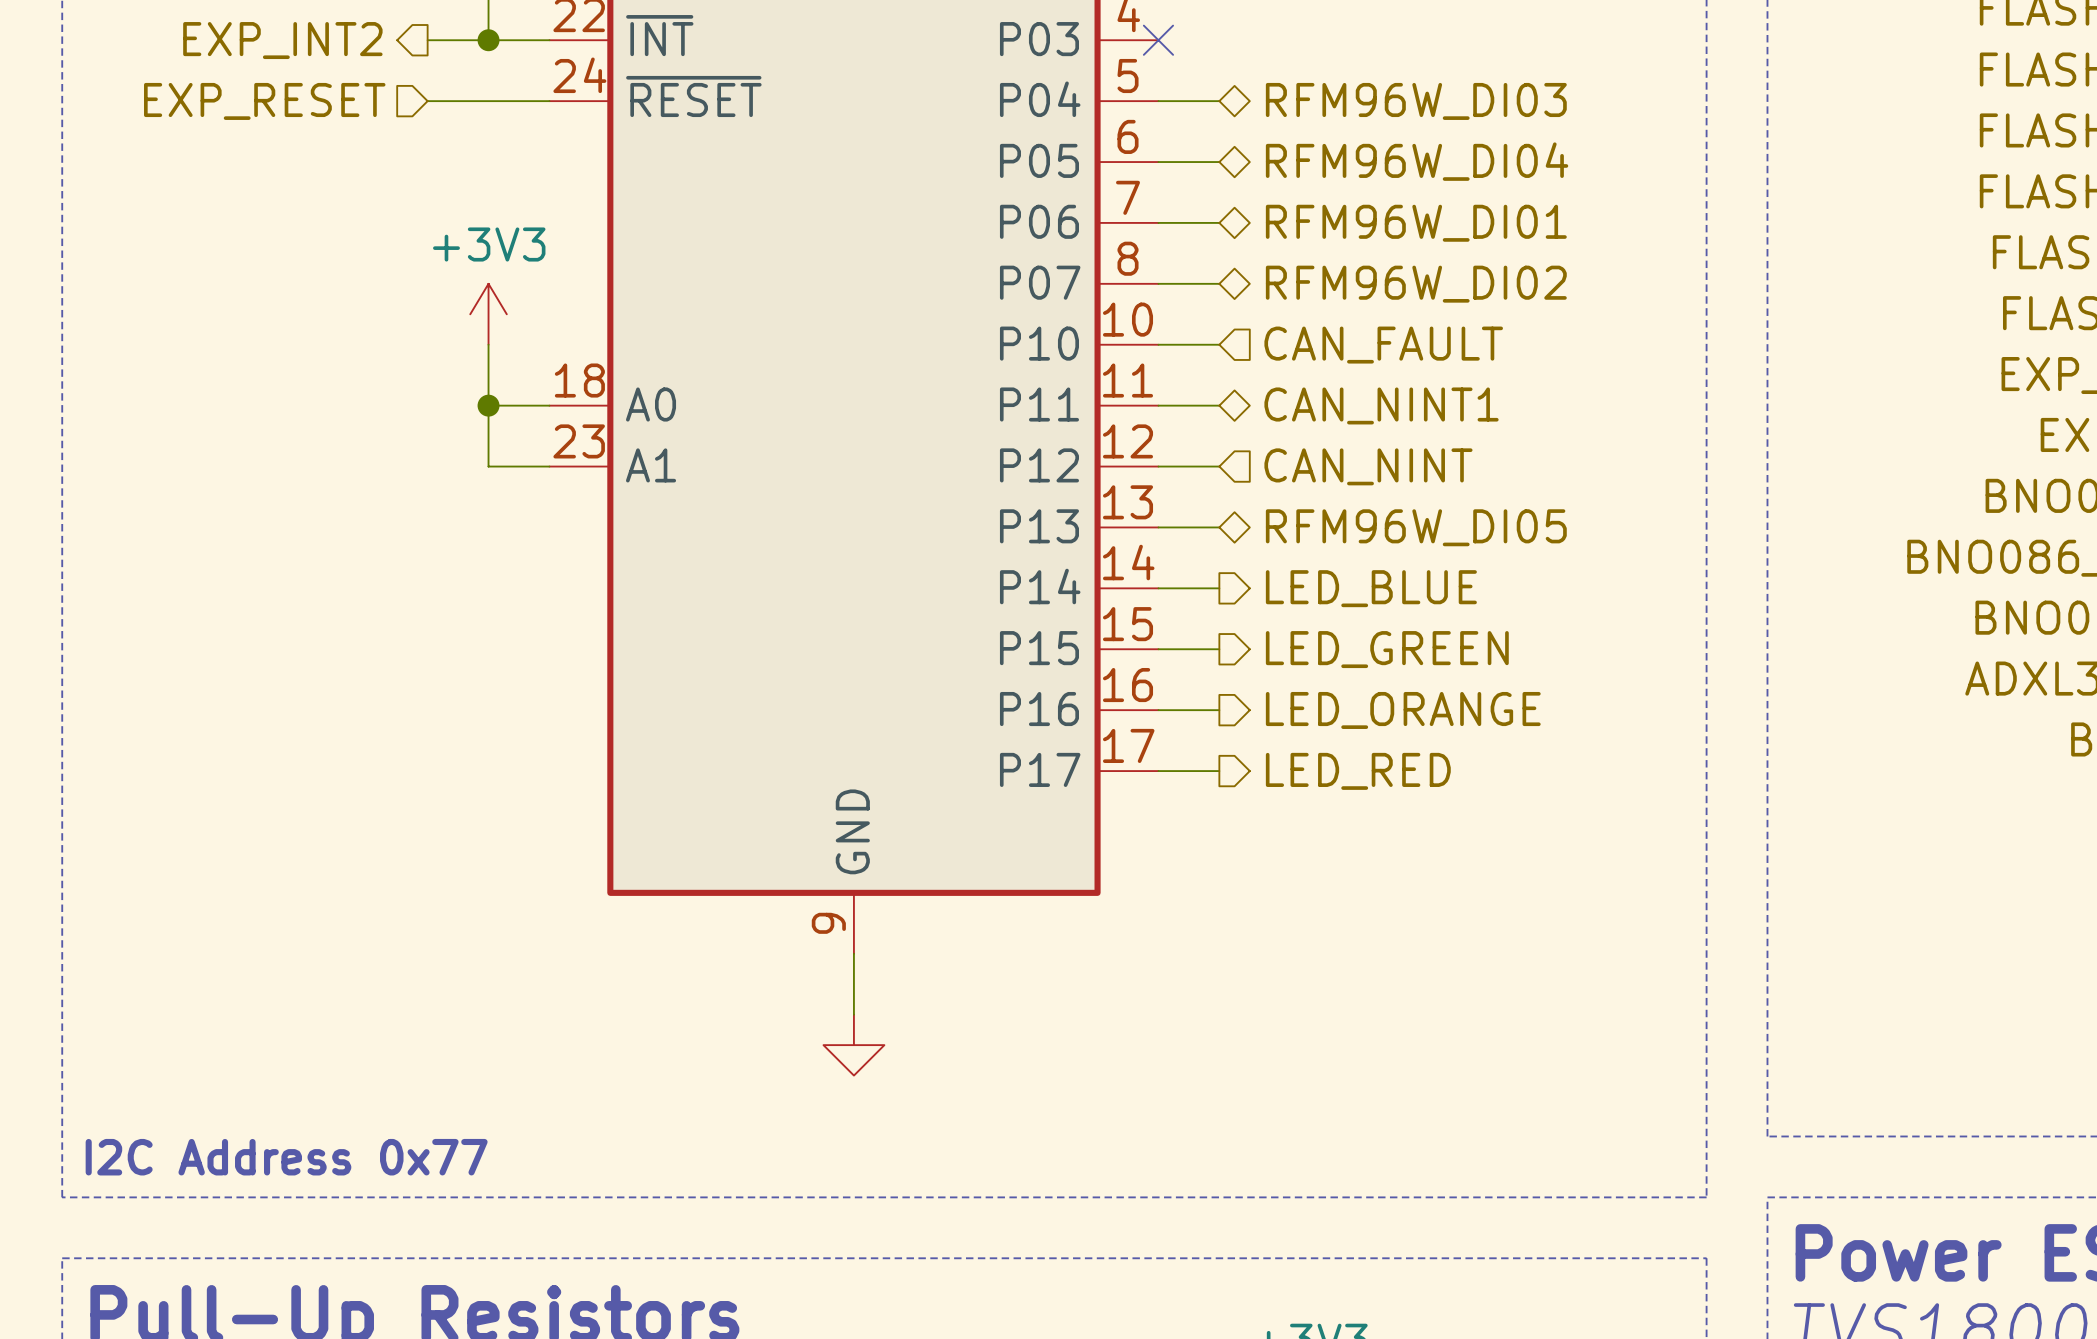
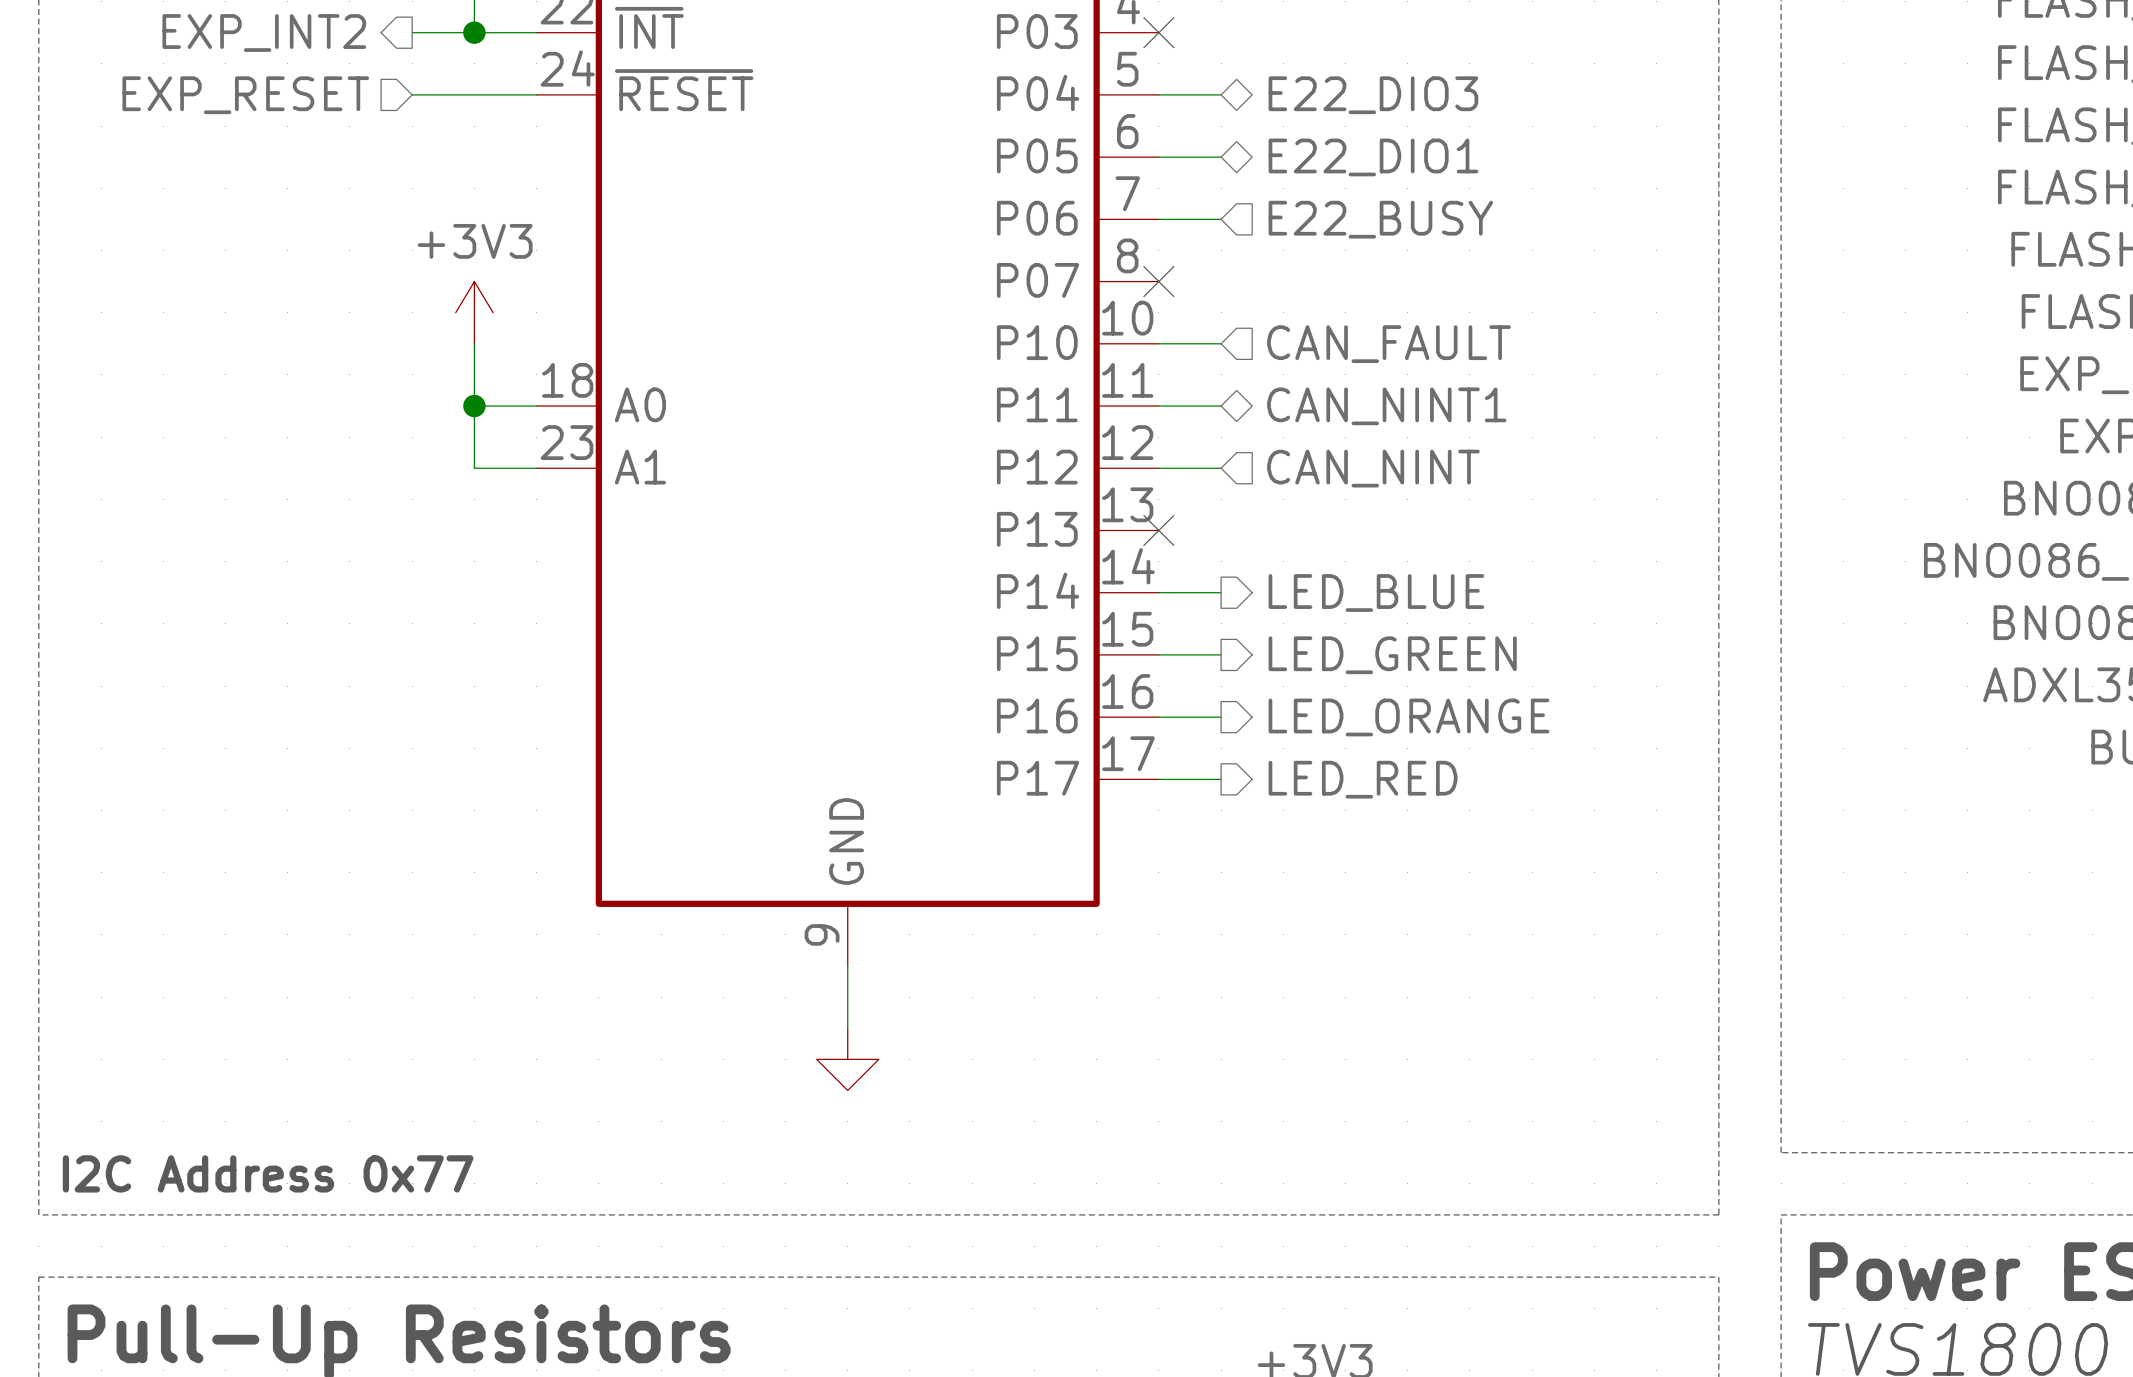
hierarchical label: RFM96W_DI03 (1416, 101) -> E22_DIO3 (1373, 95)
hierarchical label: RFM96W_DI04 (1417, 161) -> E22_DIO1 (1373, 157)
hierarchical label shape: bidirectional (1416, 223) -> input (1380, 219)
hierarchical label: RFM96W_DI01 (1416, 223) -> E22_BUSY (1380, 219)
wire: (1158, 283) (1219, 283) -> none
no-connect mark: none -> (1158, 281)
hierarchical label: RFM96W_DI02 (1416, 284) -> none
wire: (1158, 527) (1219, 527) -> none
no-connect mark: none -> (1158, 530)
hierarchical label: RFM96W_DI05 (1416, 527) -> none

